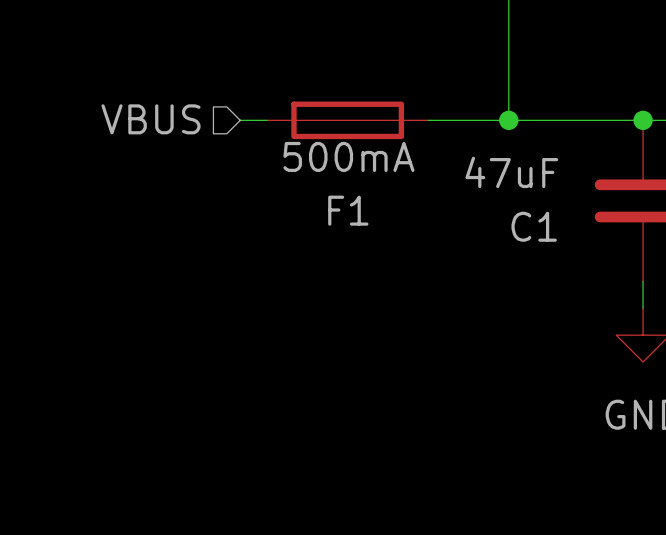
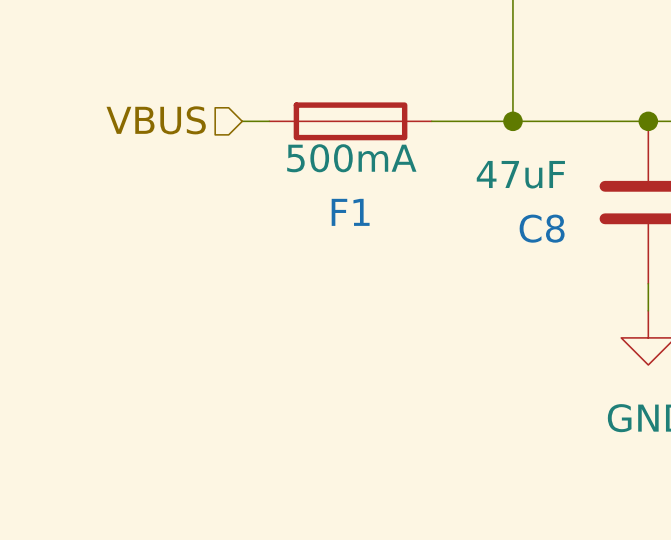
C1 name: C1 (534, 226) -> C8 (542, 228)

